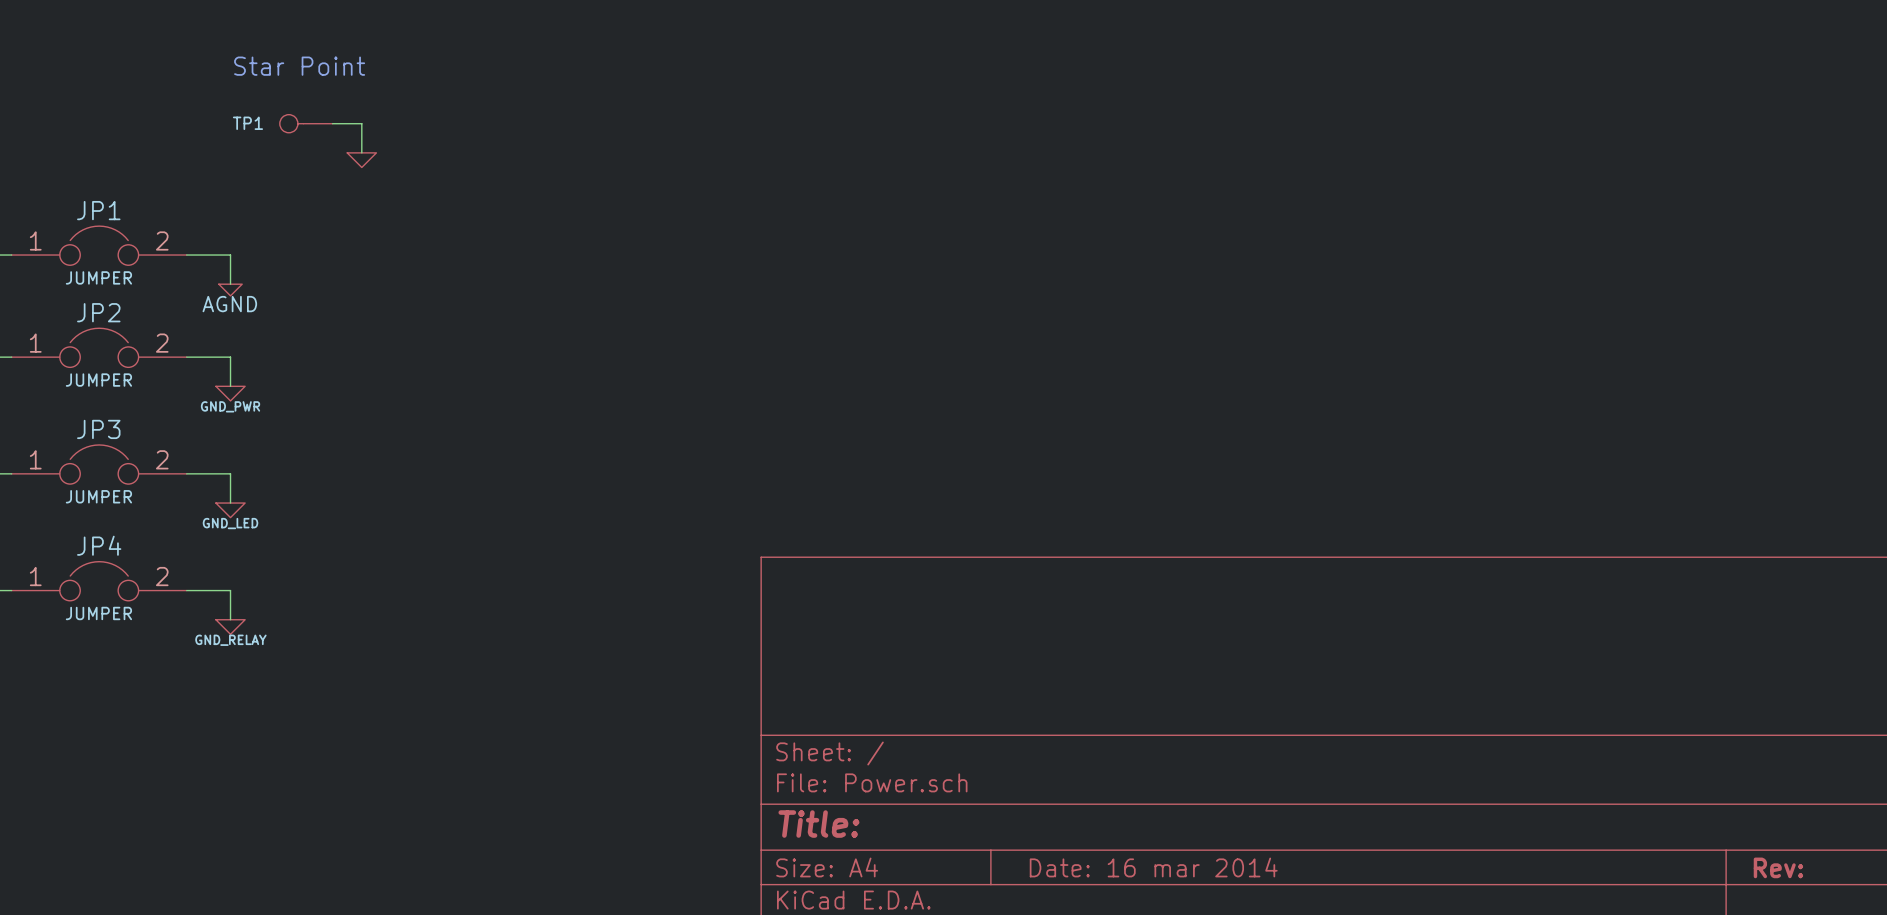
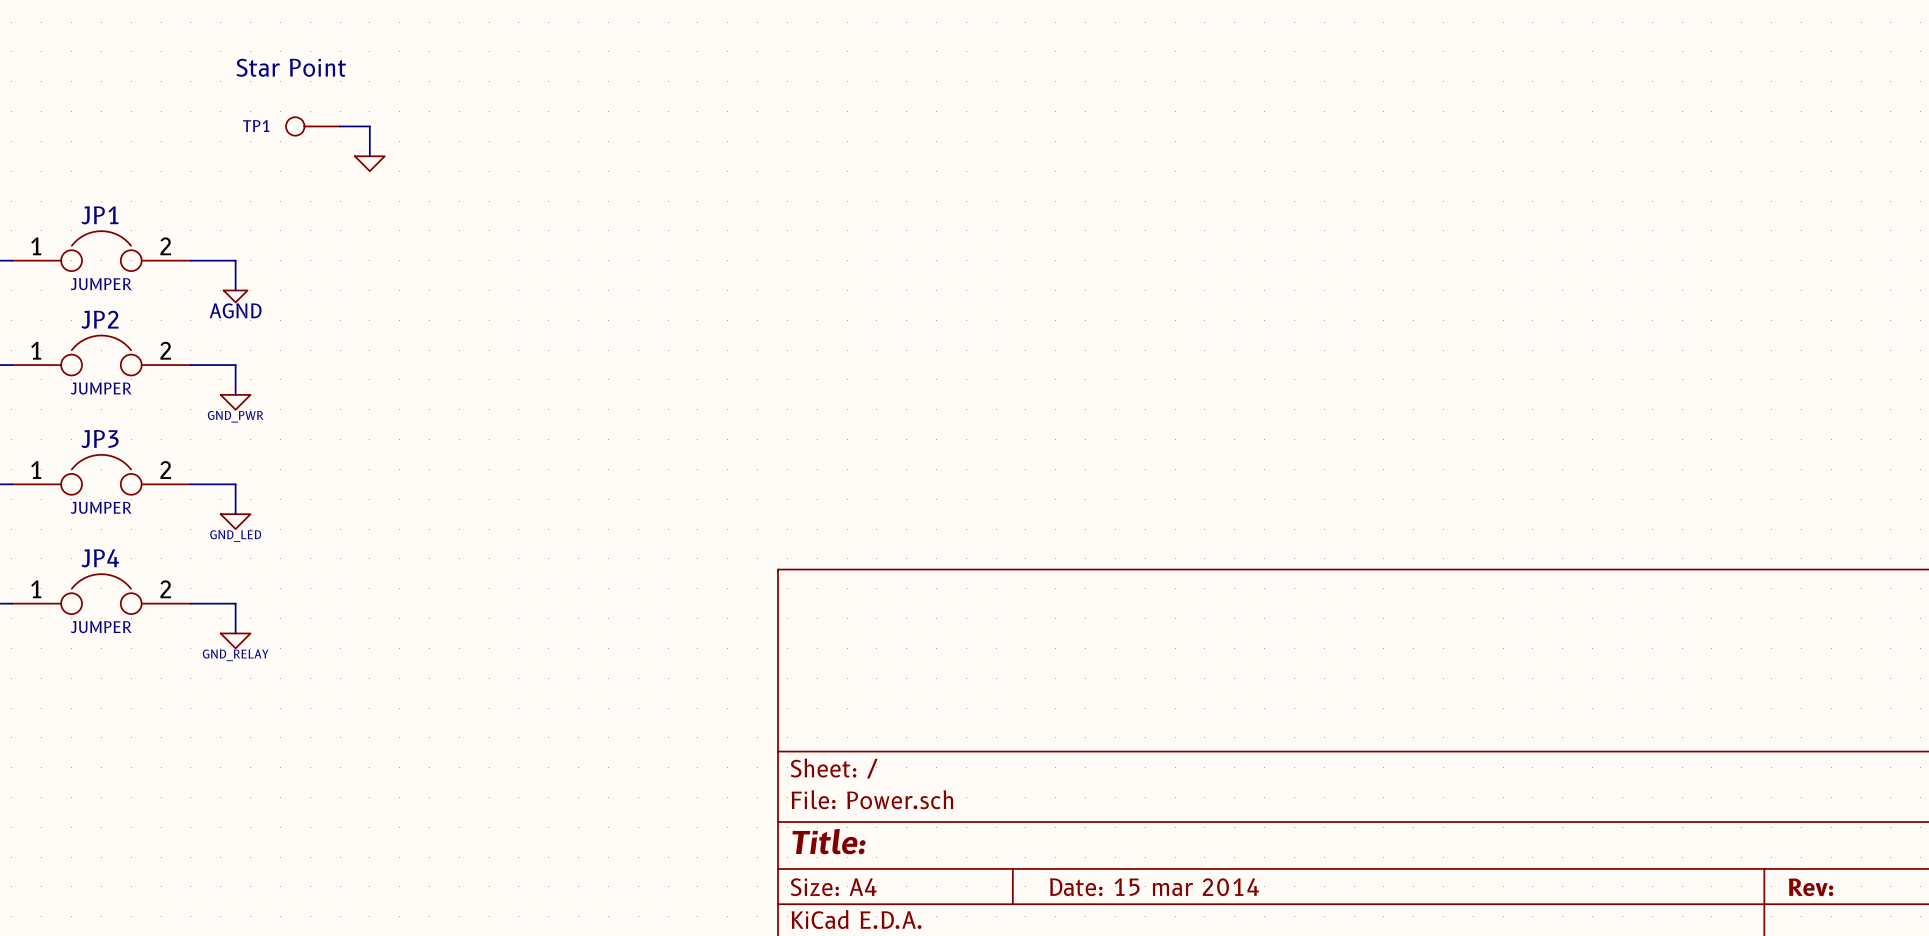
title block: Date: 16 mar 2014 (1153, 867) -> Date: 15 mar 2014 (1154, 887)

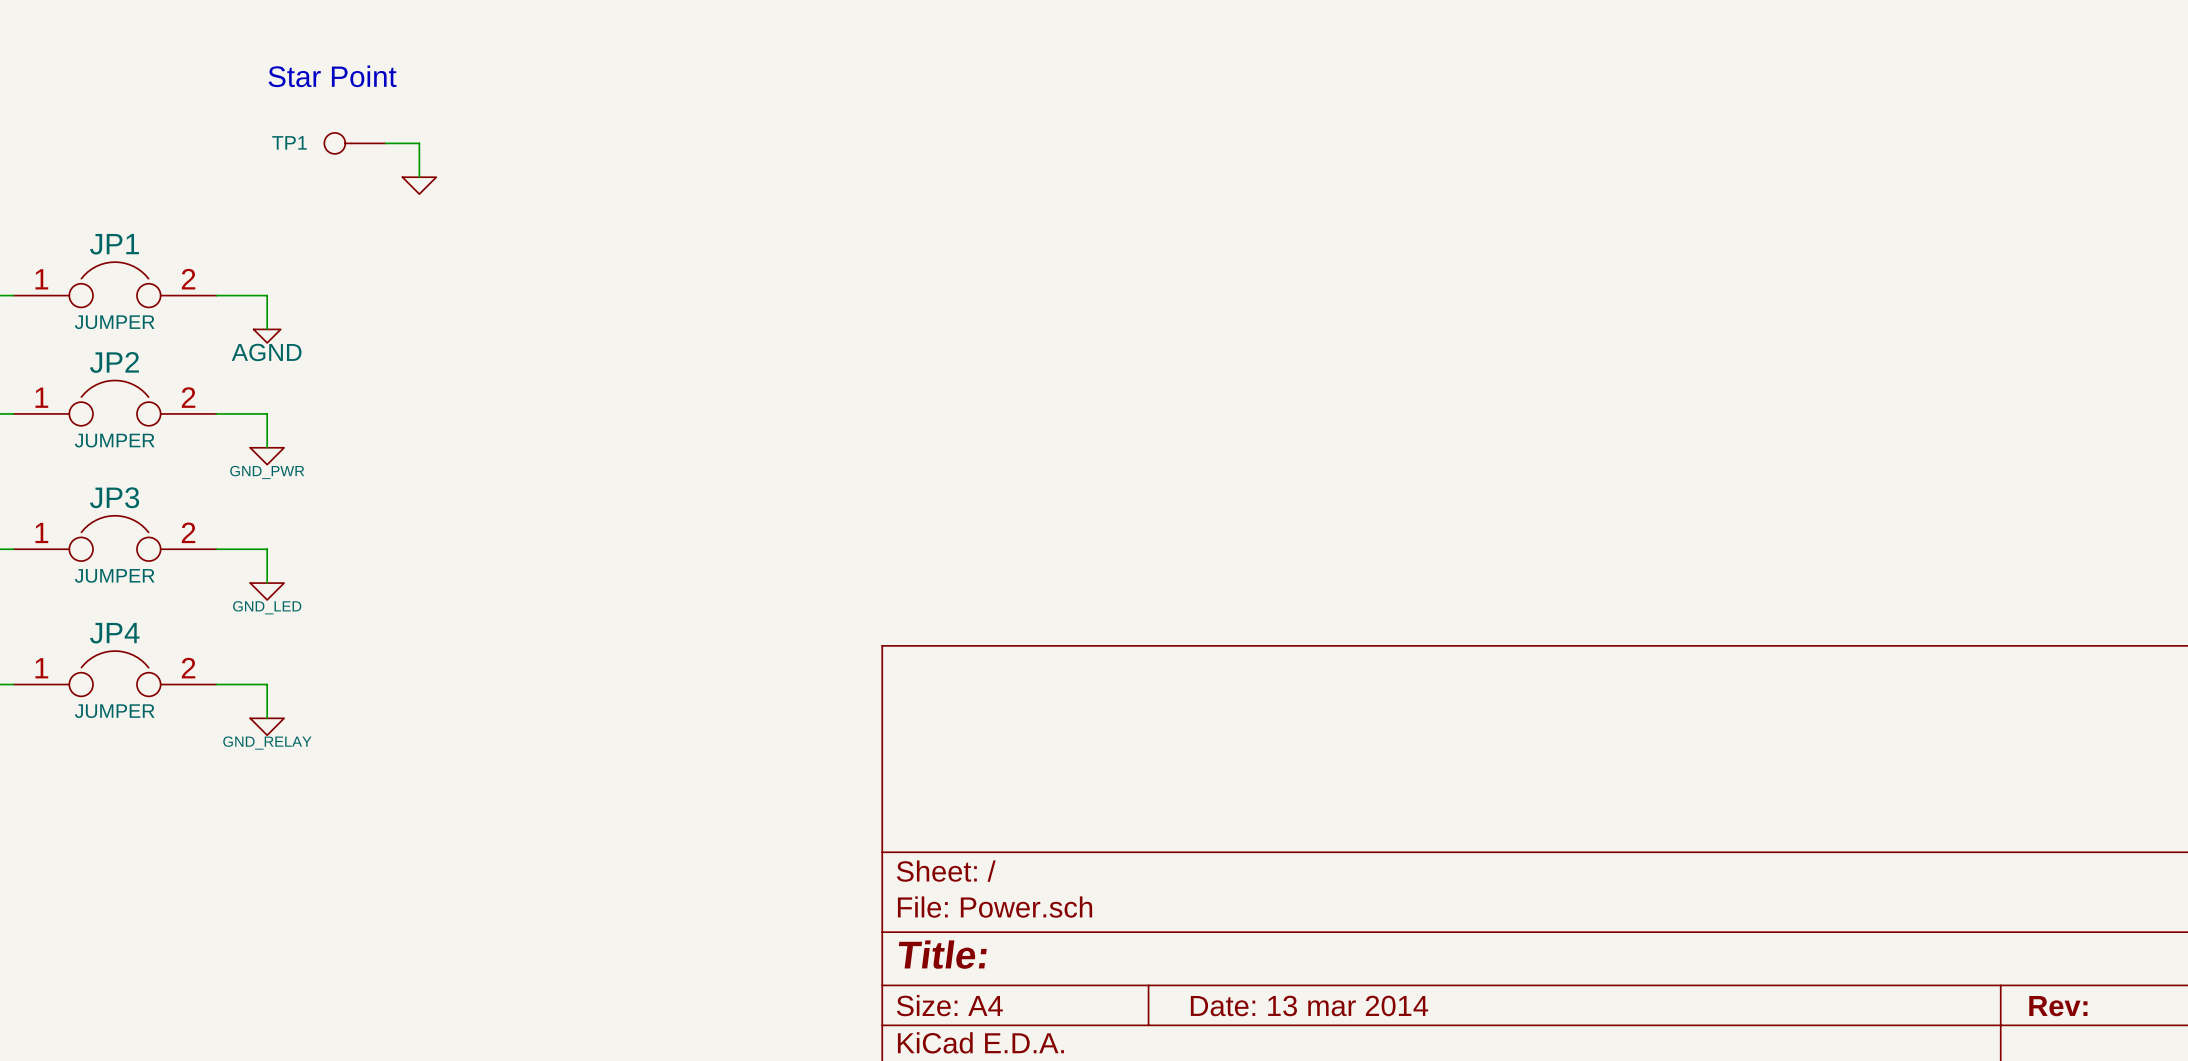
title block: Date: 15 mar 2014 (1154, 887) -> Date: 13 mar 2014 (1309, 1005)

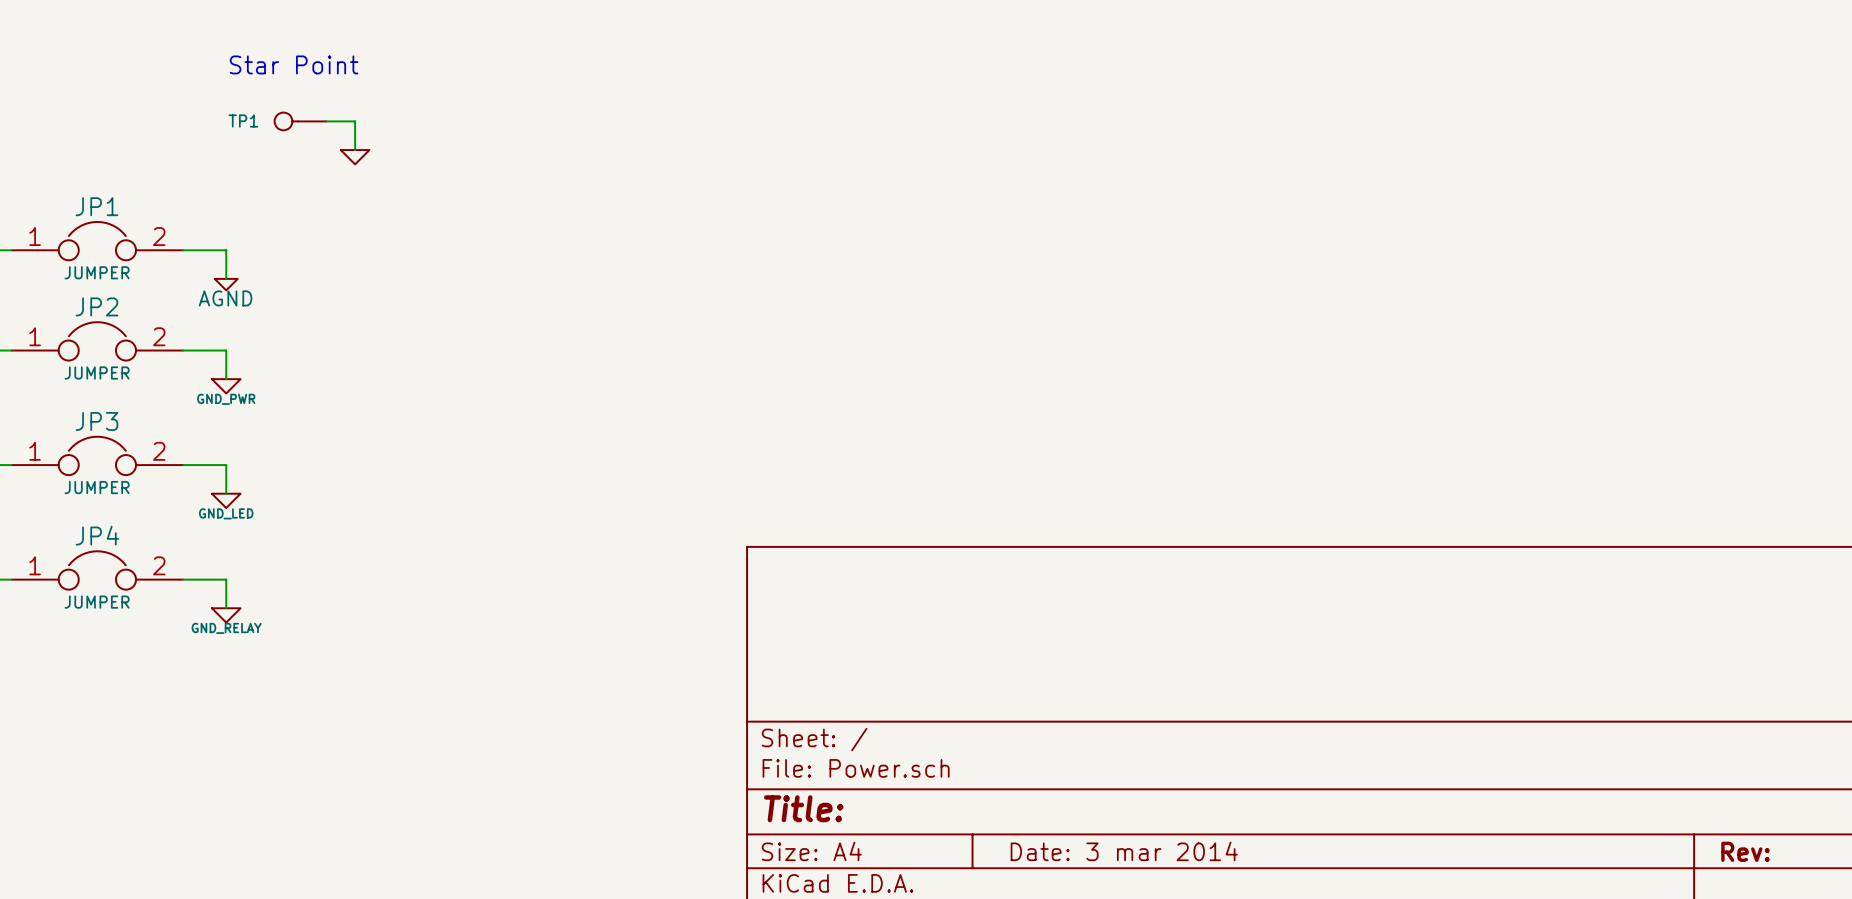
title block: Date: 13 mar 2014 (1309, 1005) -> Date: 3 mar 2014 (1124, 851)

